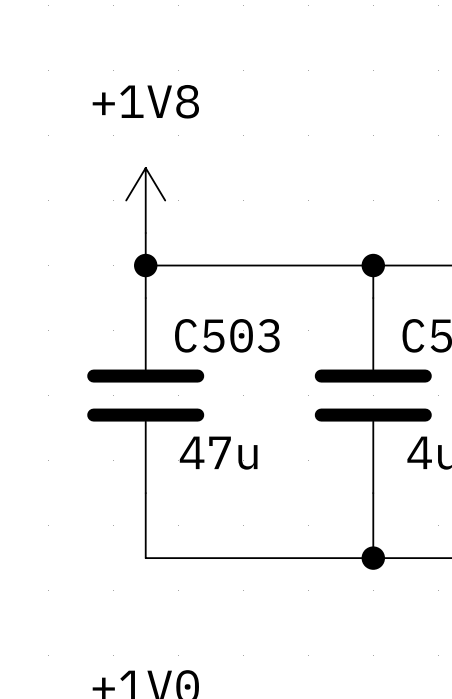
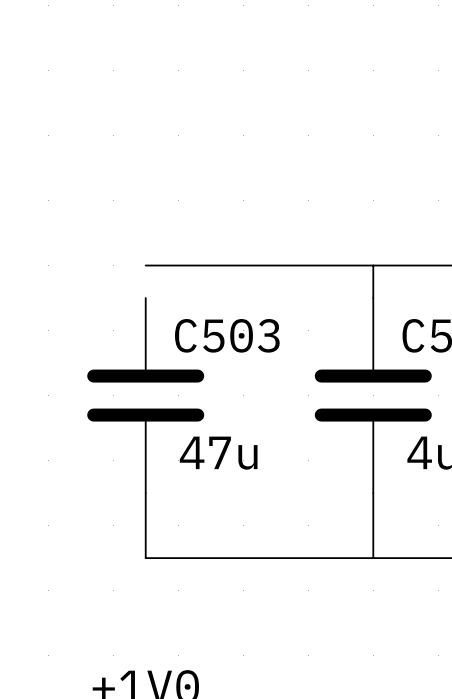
power symbol: +1V8 (145, 200) -> none
wire: (145, 233) (145, 298) -> none
junction: (145, 265) -> none
junction: (373, 265) -> none
junction: (373, 558) -> none

